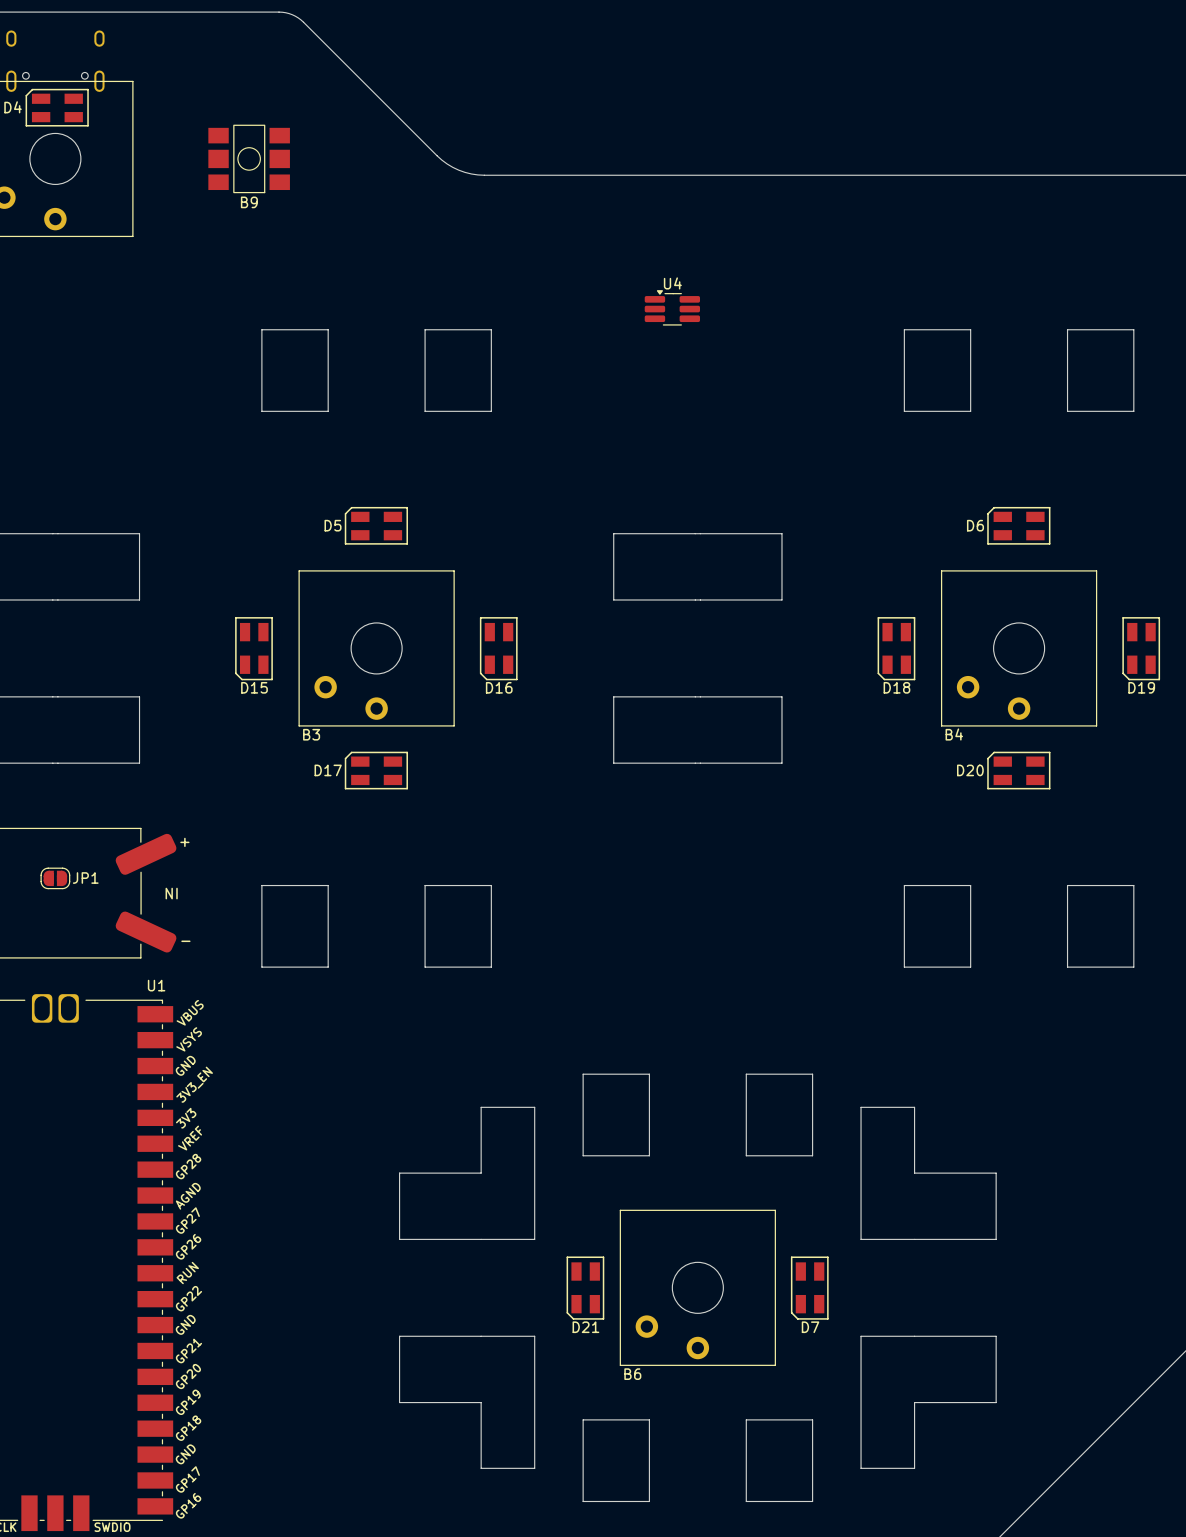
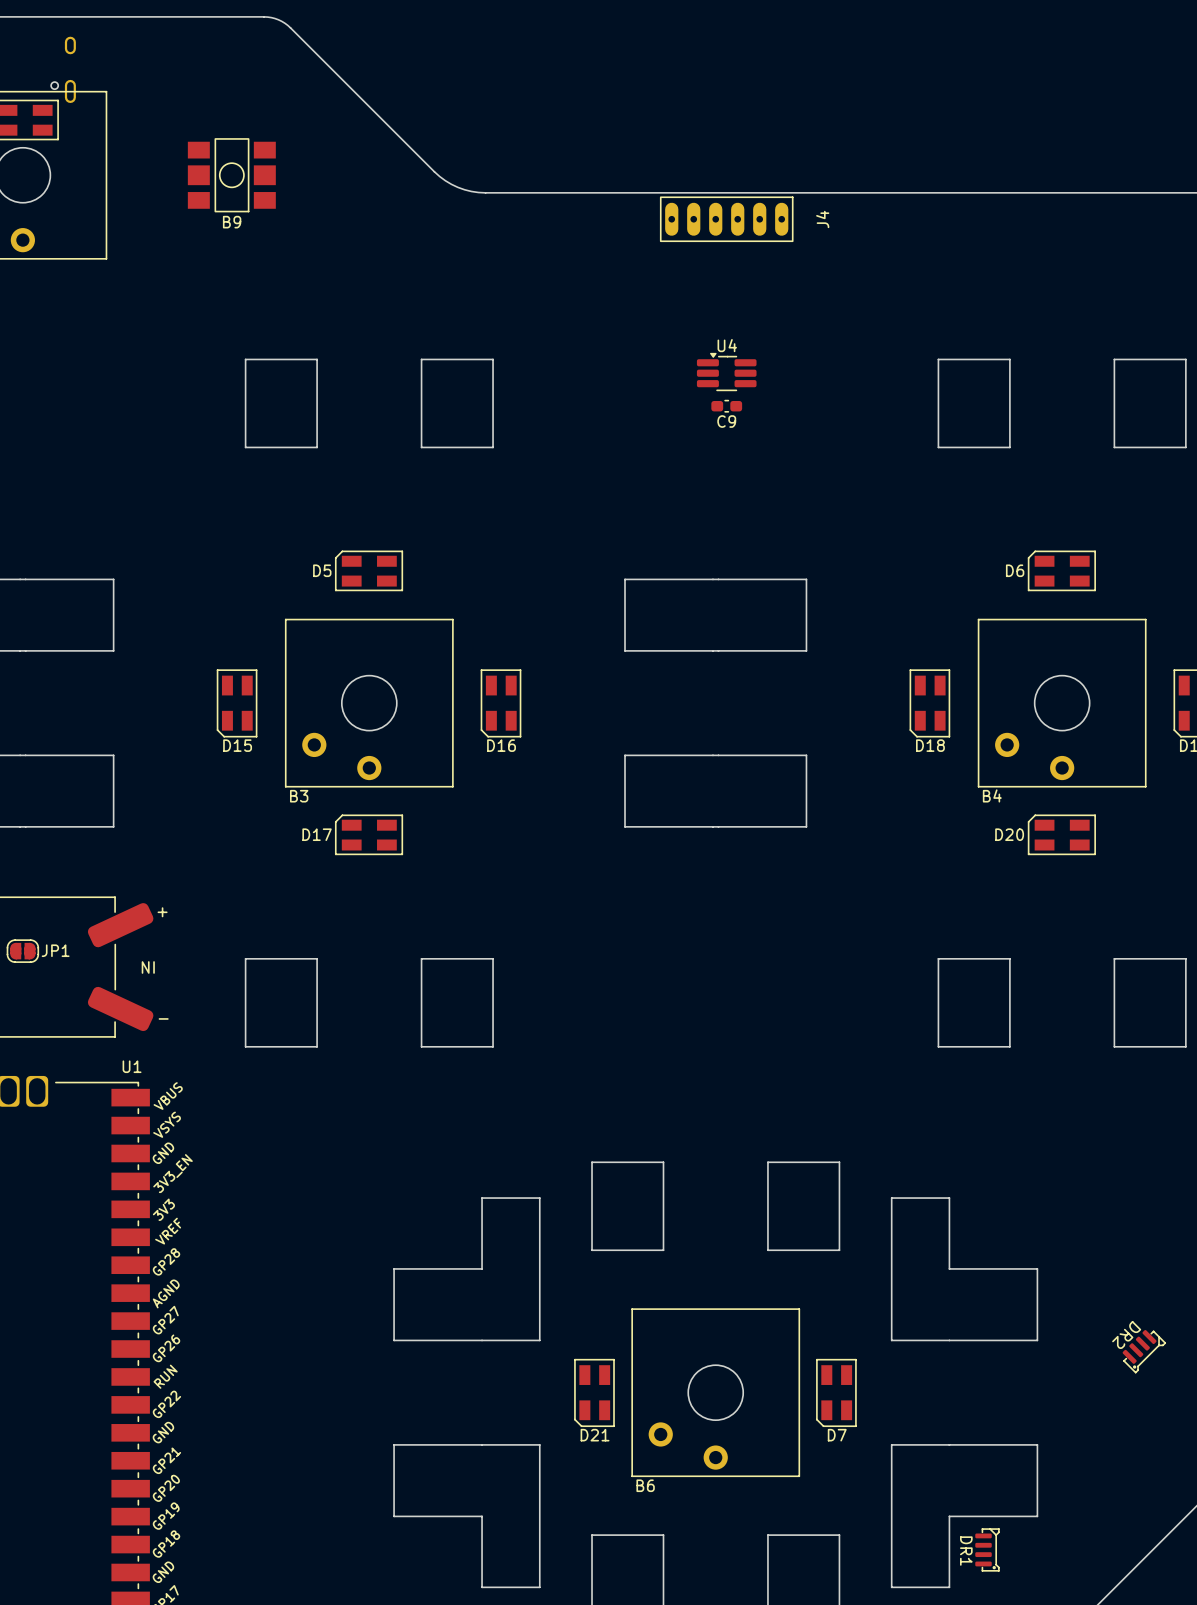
J4: none -> (726, 219)
U4 position: (672, 307) -> (726, 371)
C9: none -> (726, 406)
DR2: none -> (1144, 1351)
DR1: none -> (987, 1549)

